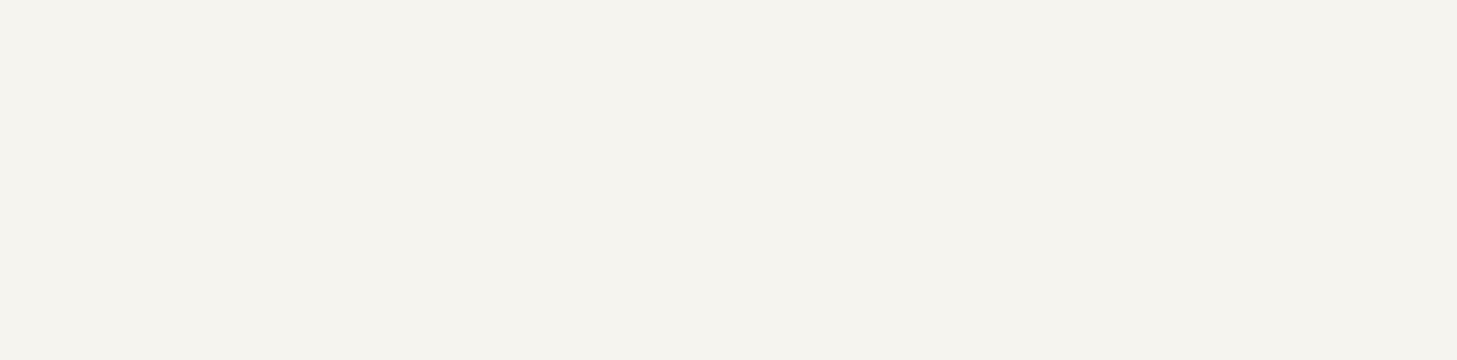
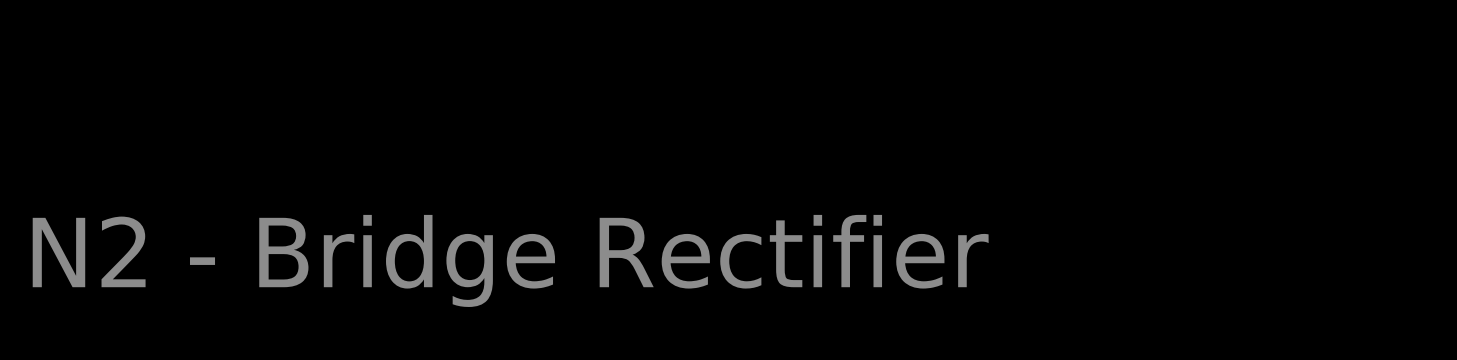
text: none -> N2 - Bridge Rectifier (510, 260)

